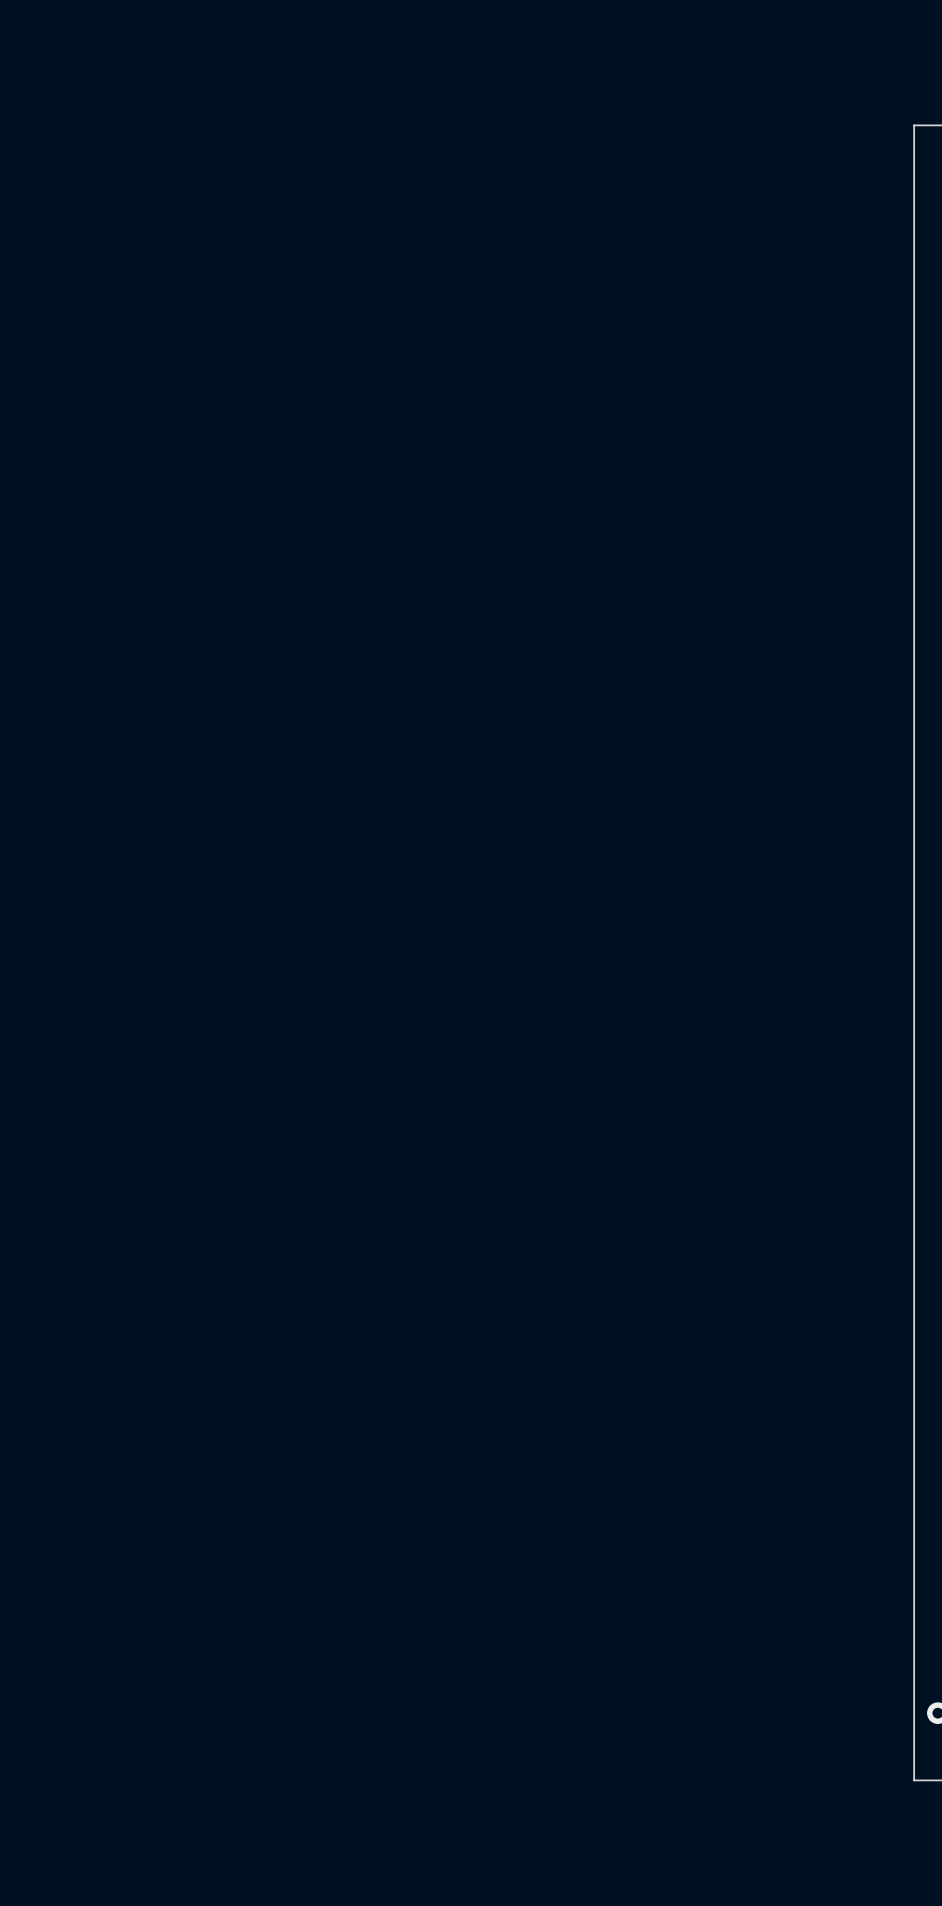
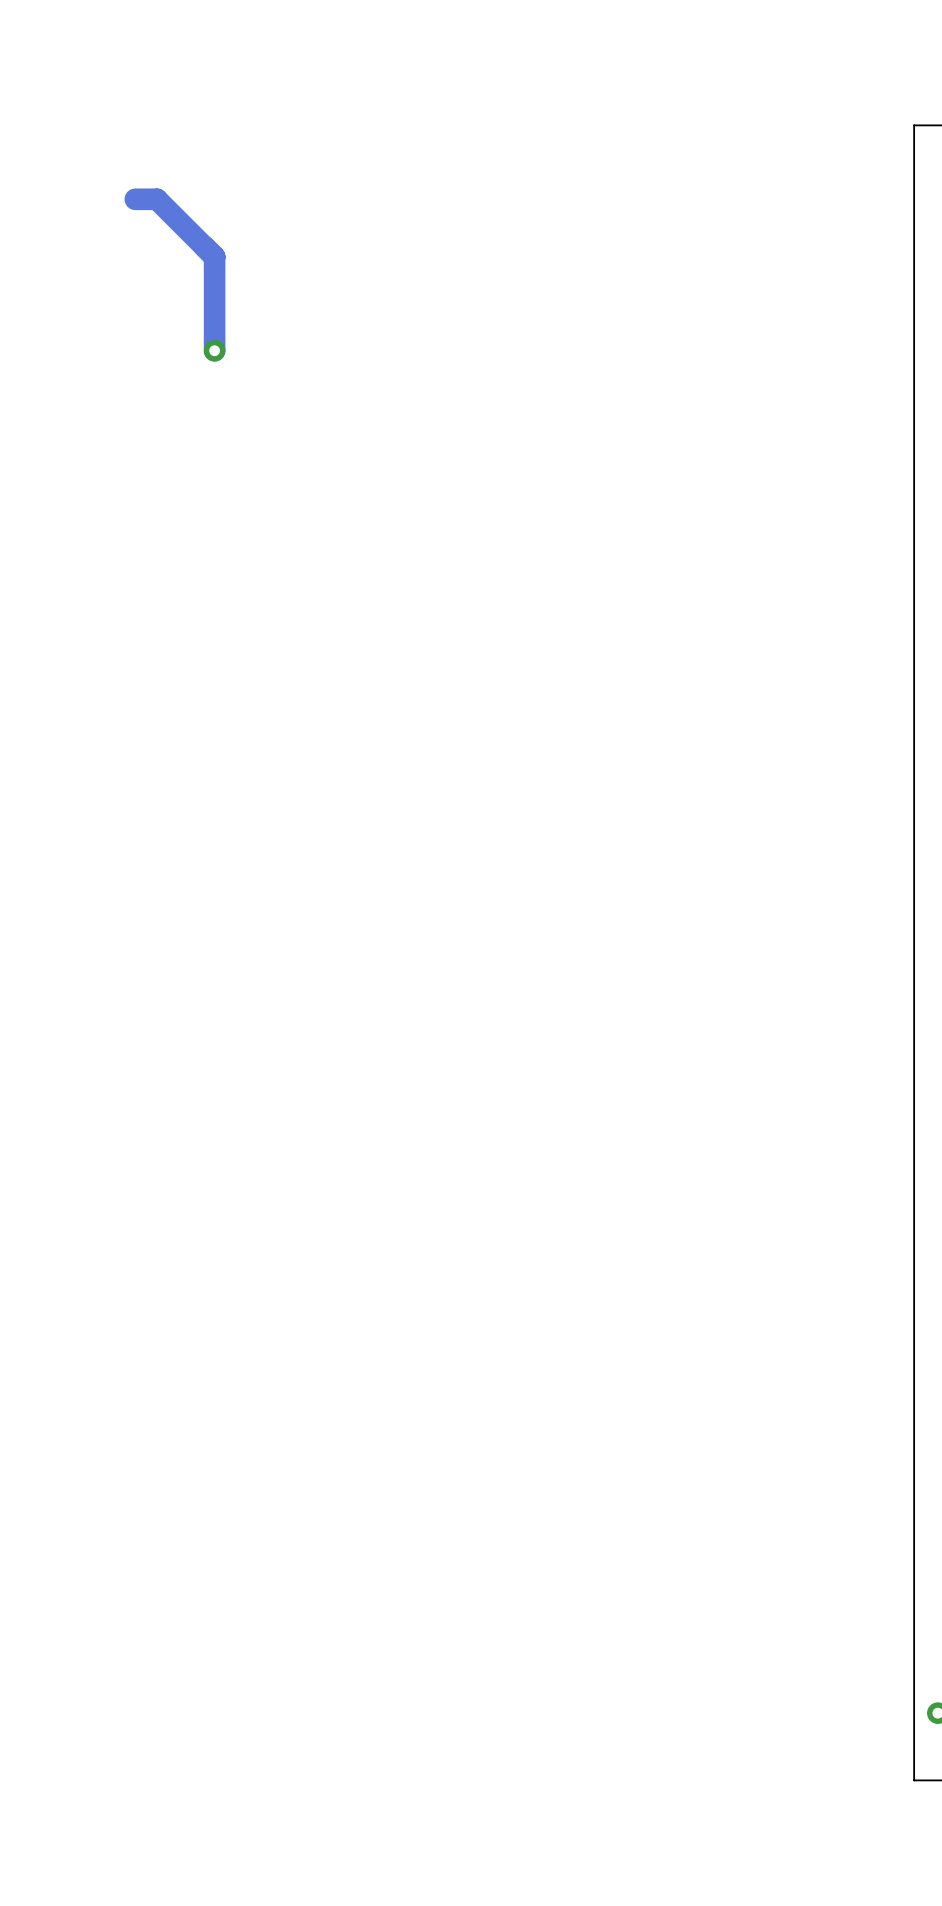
track: none -> (135, 199) (156, 199) (214, 256) (214, 350)
via: none -> (214, 350)

